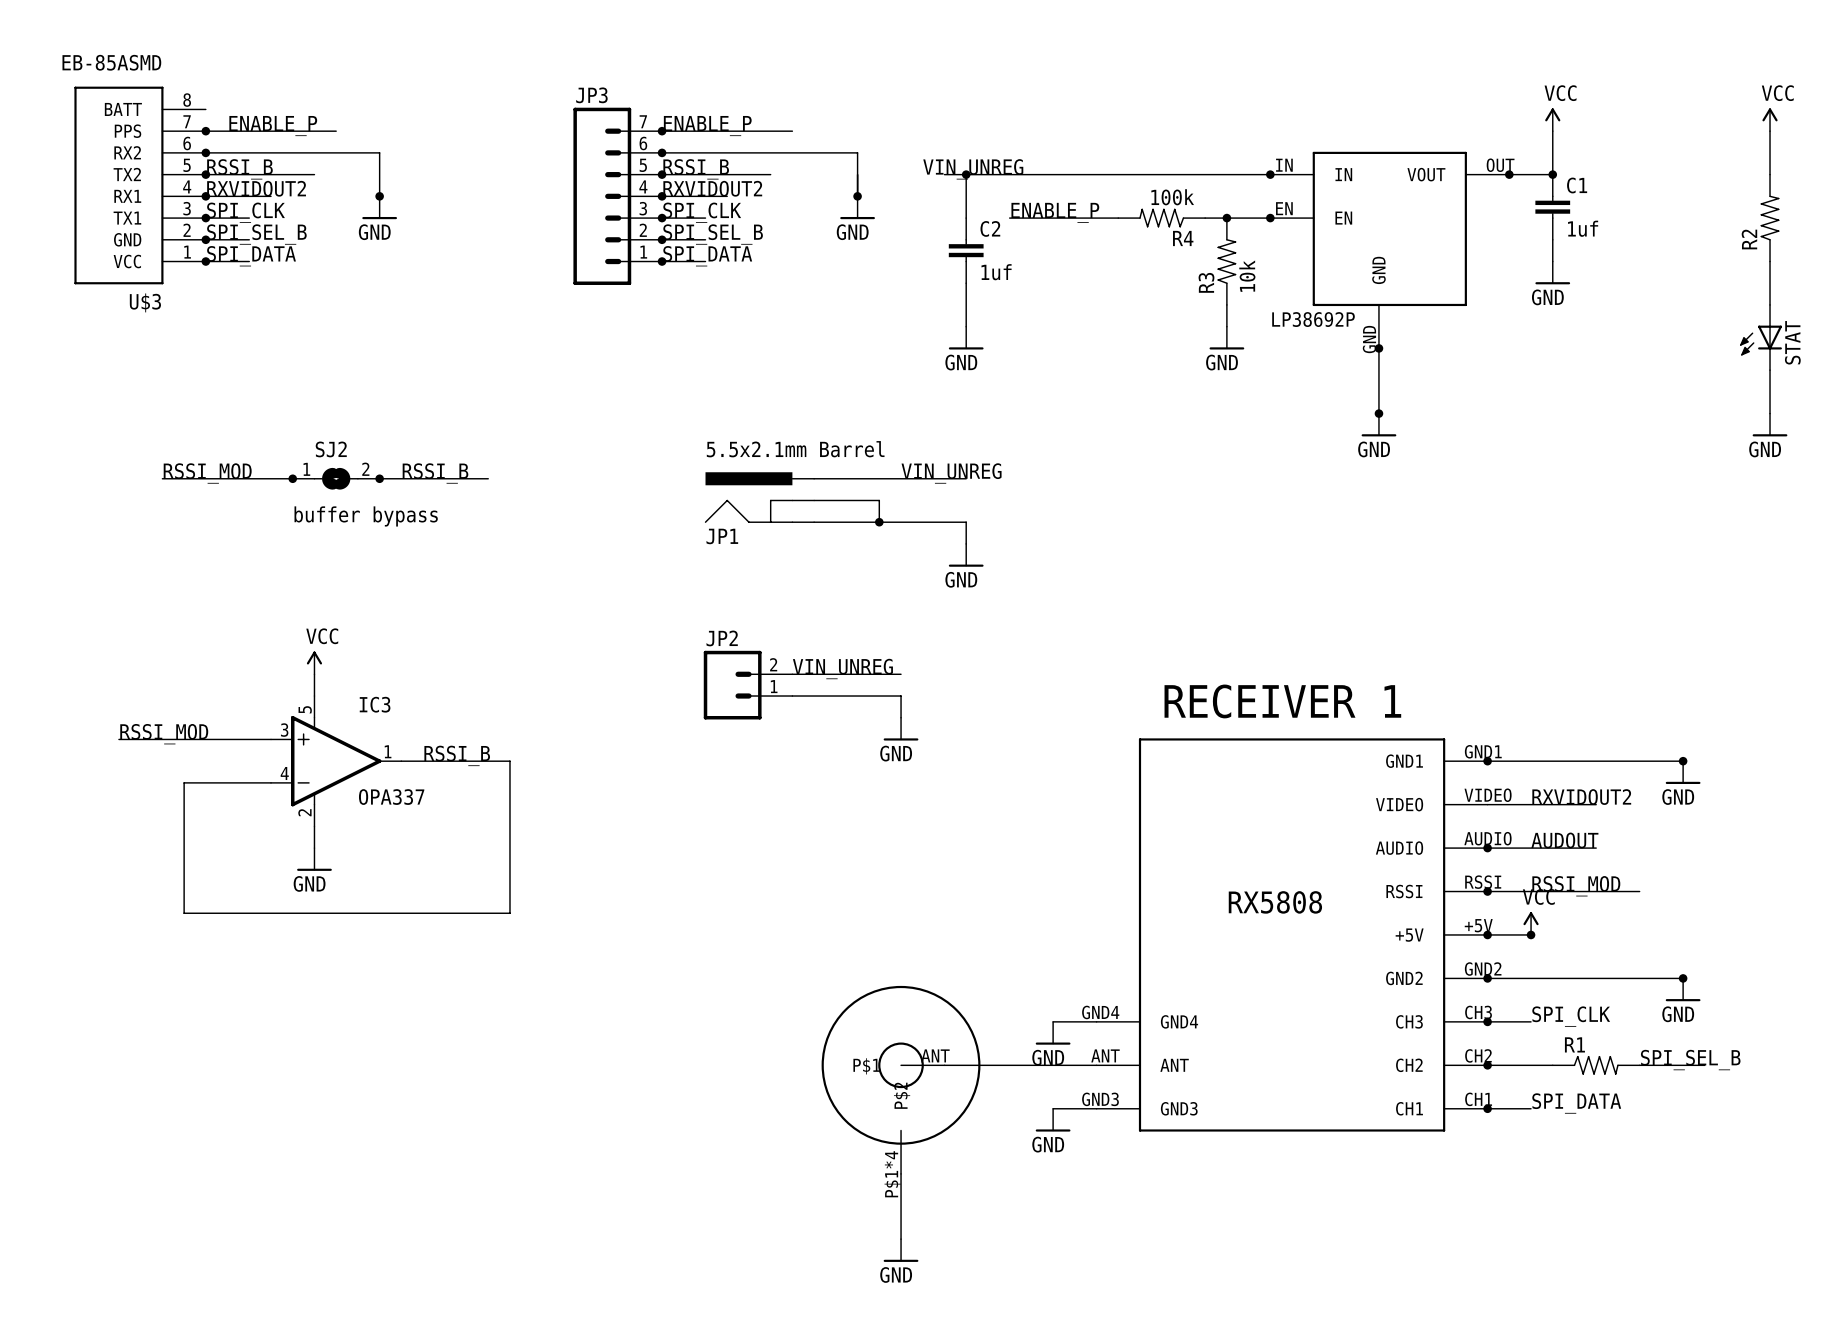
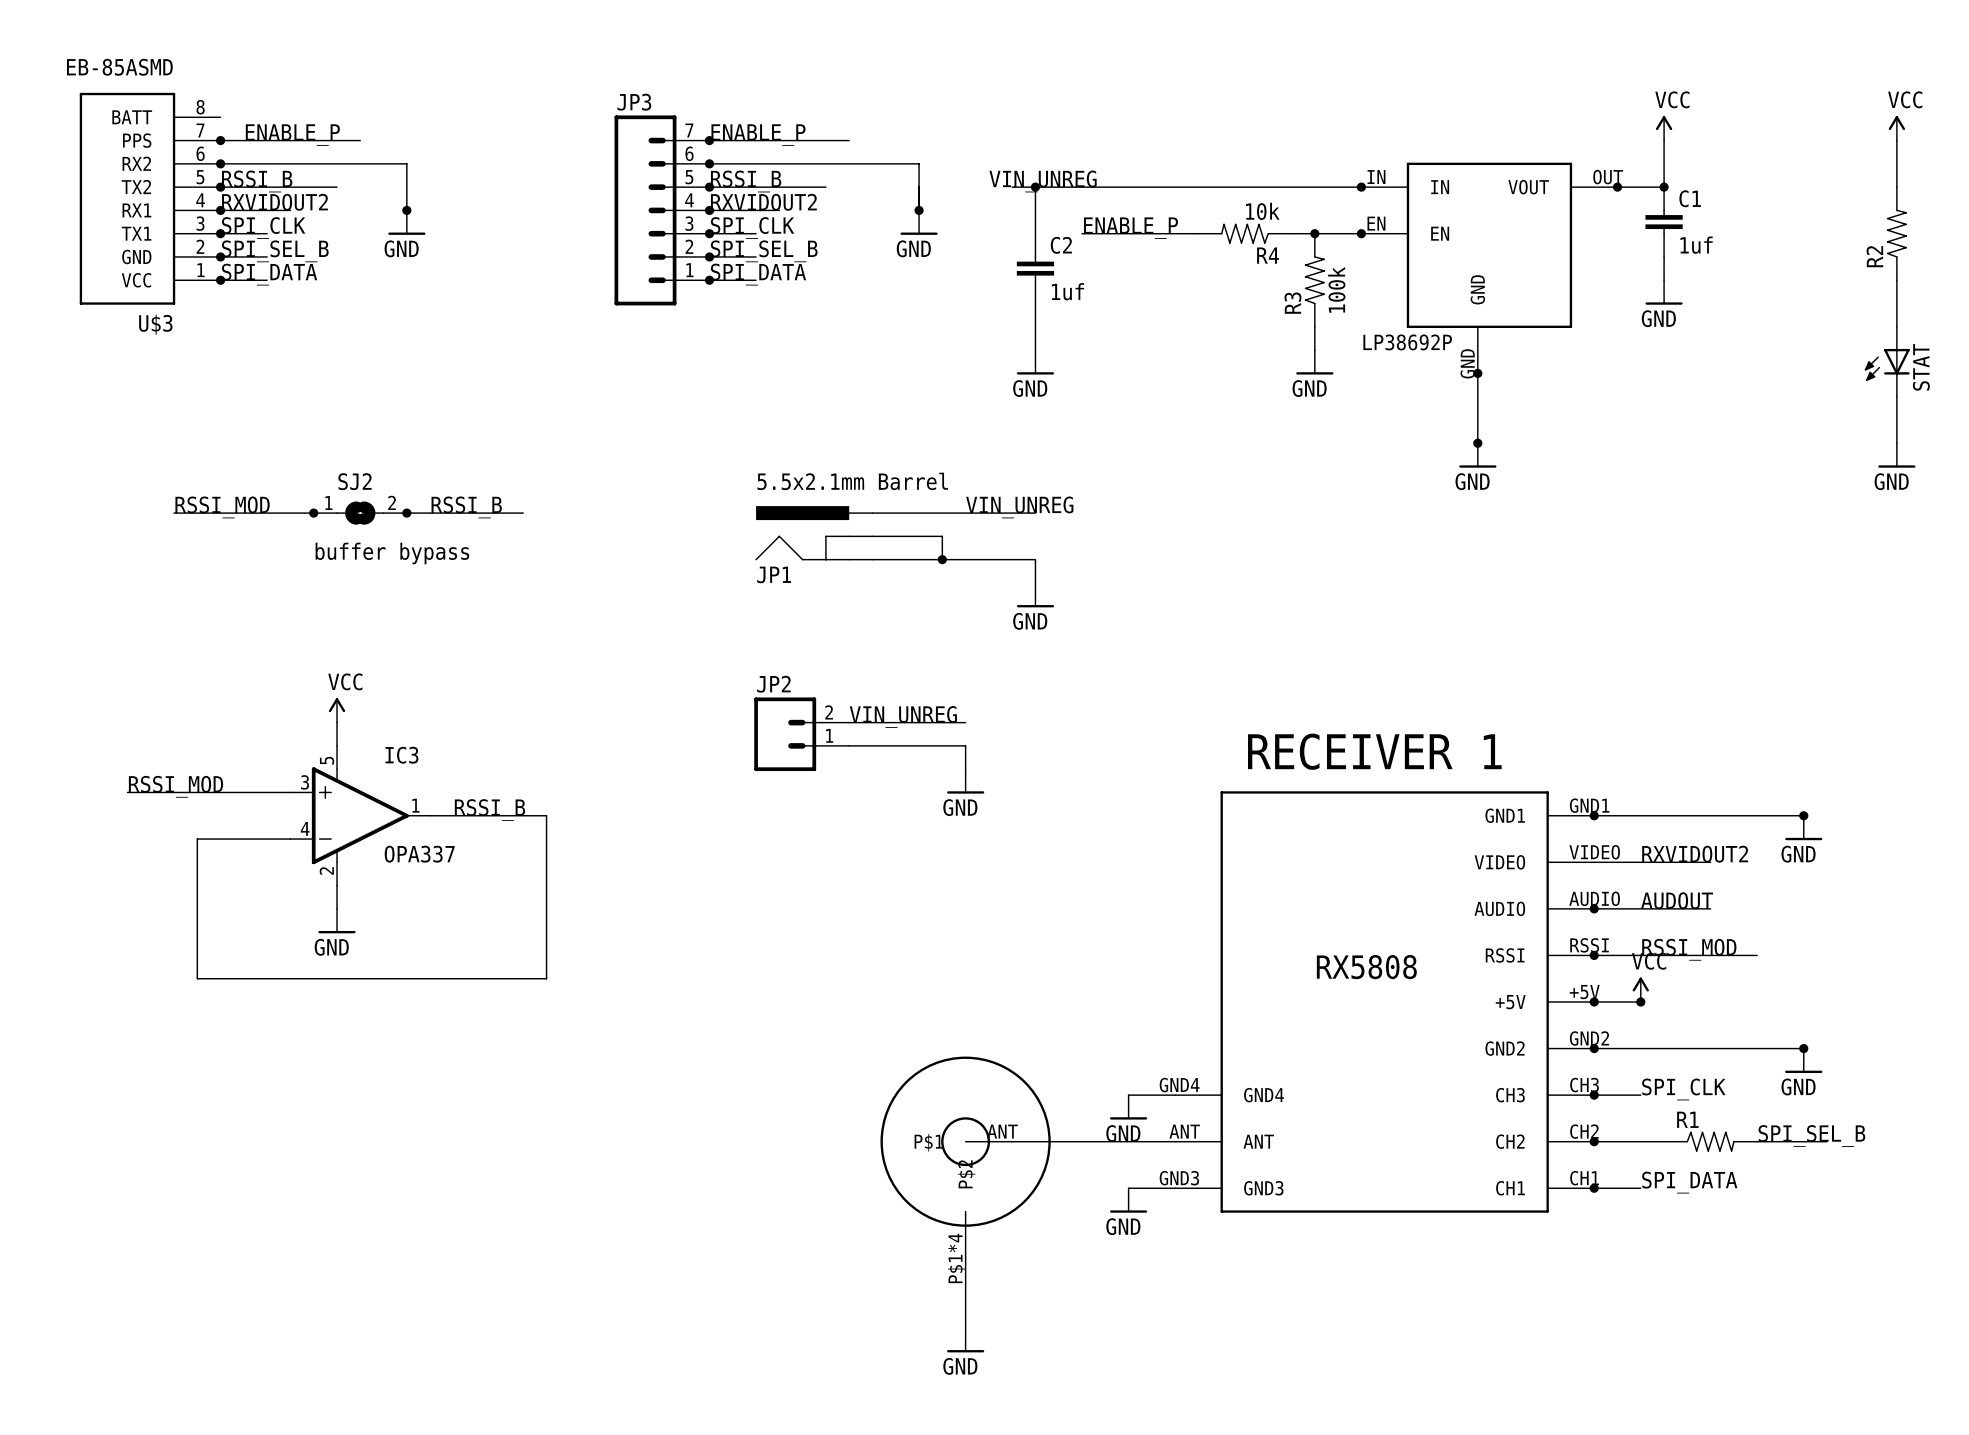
R4 value: 100k (1172, 197) -> 10k (1262, 211)
R3 value: 10k (1247, 276) -> 100k (1336, 289)

